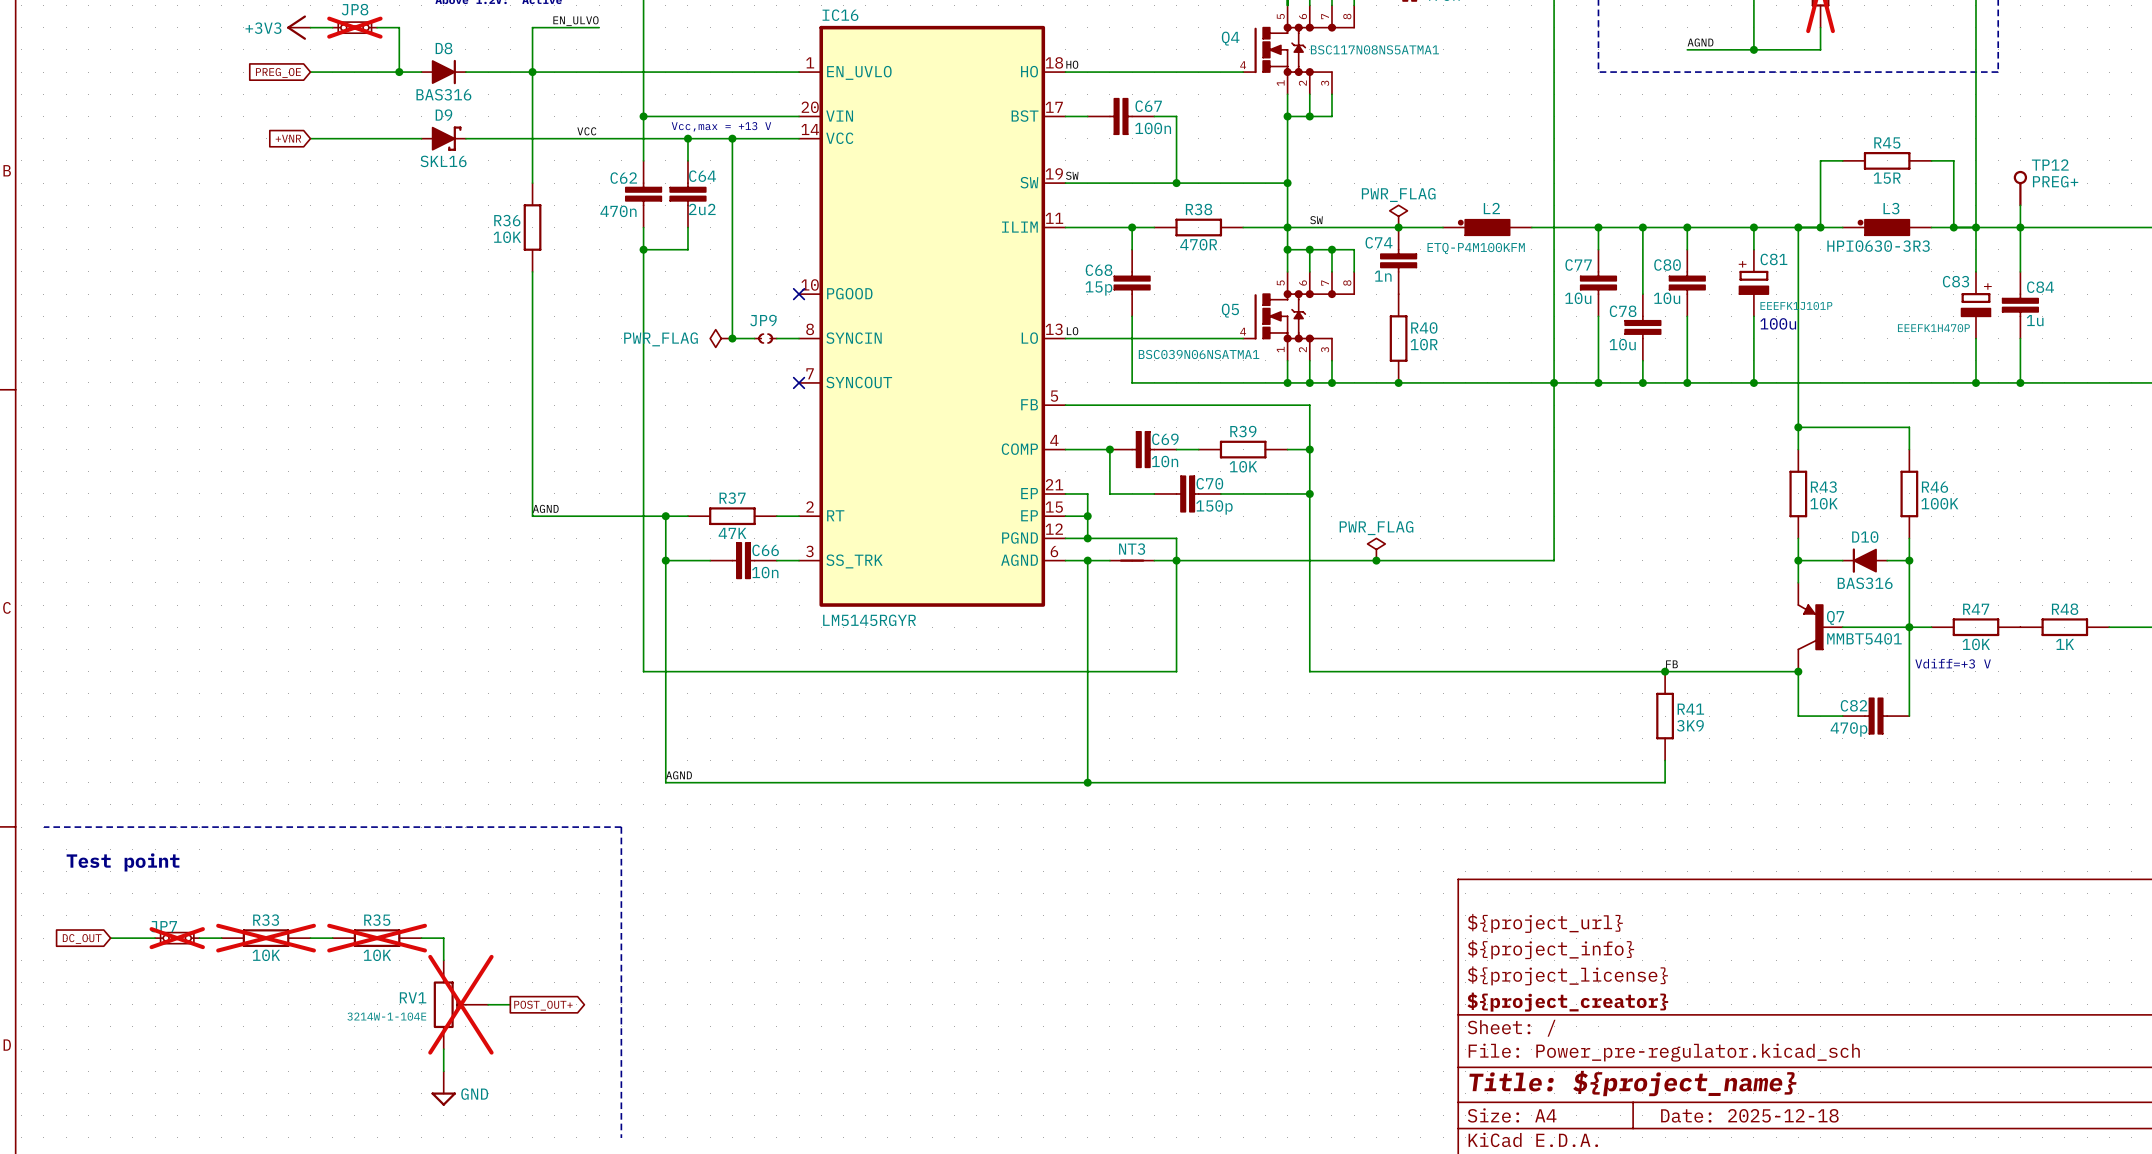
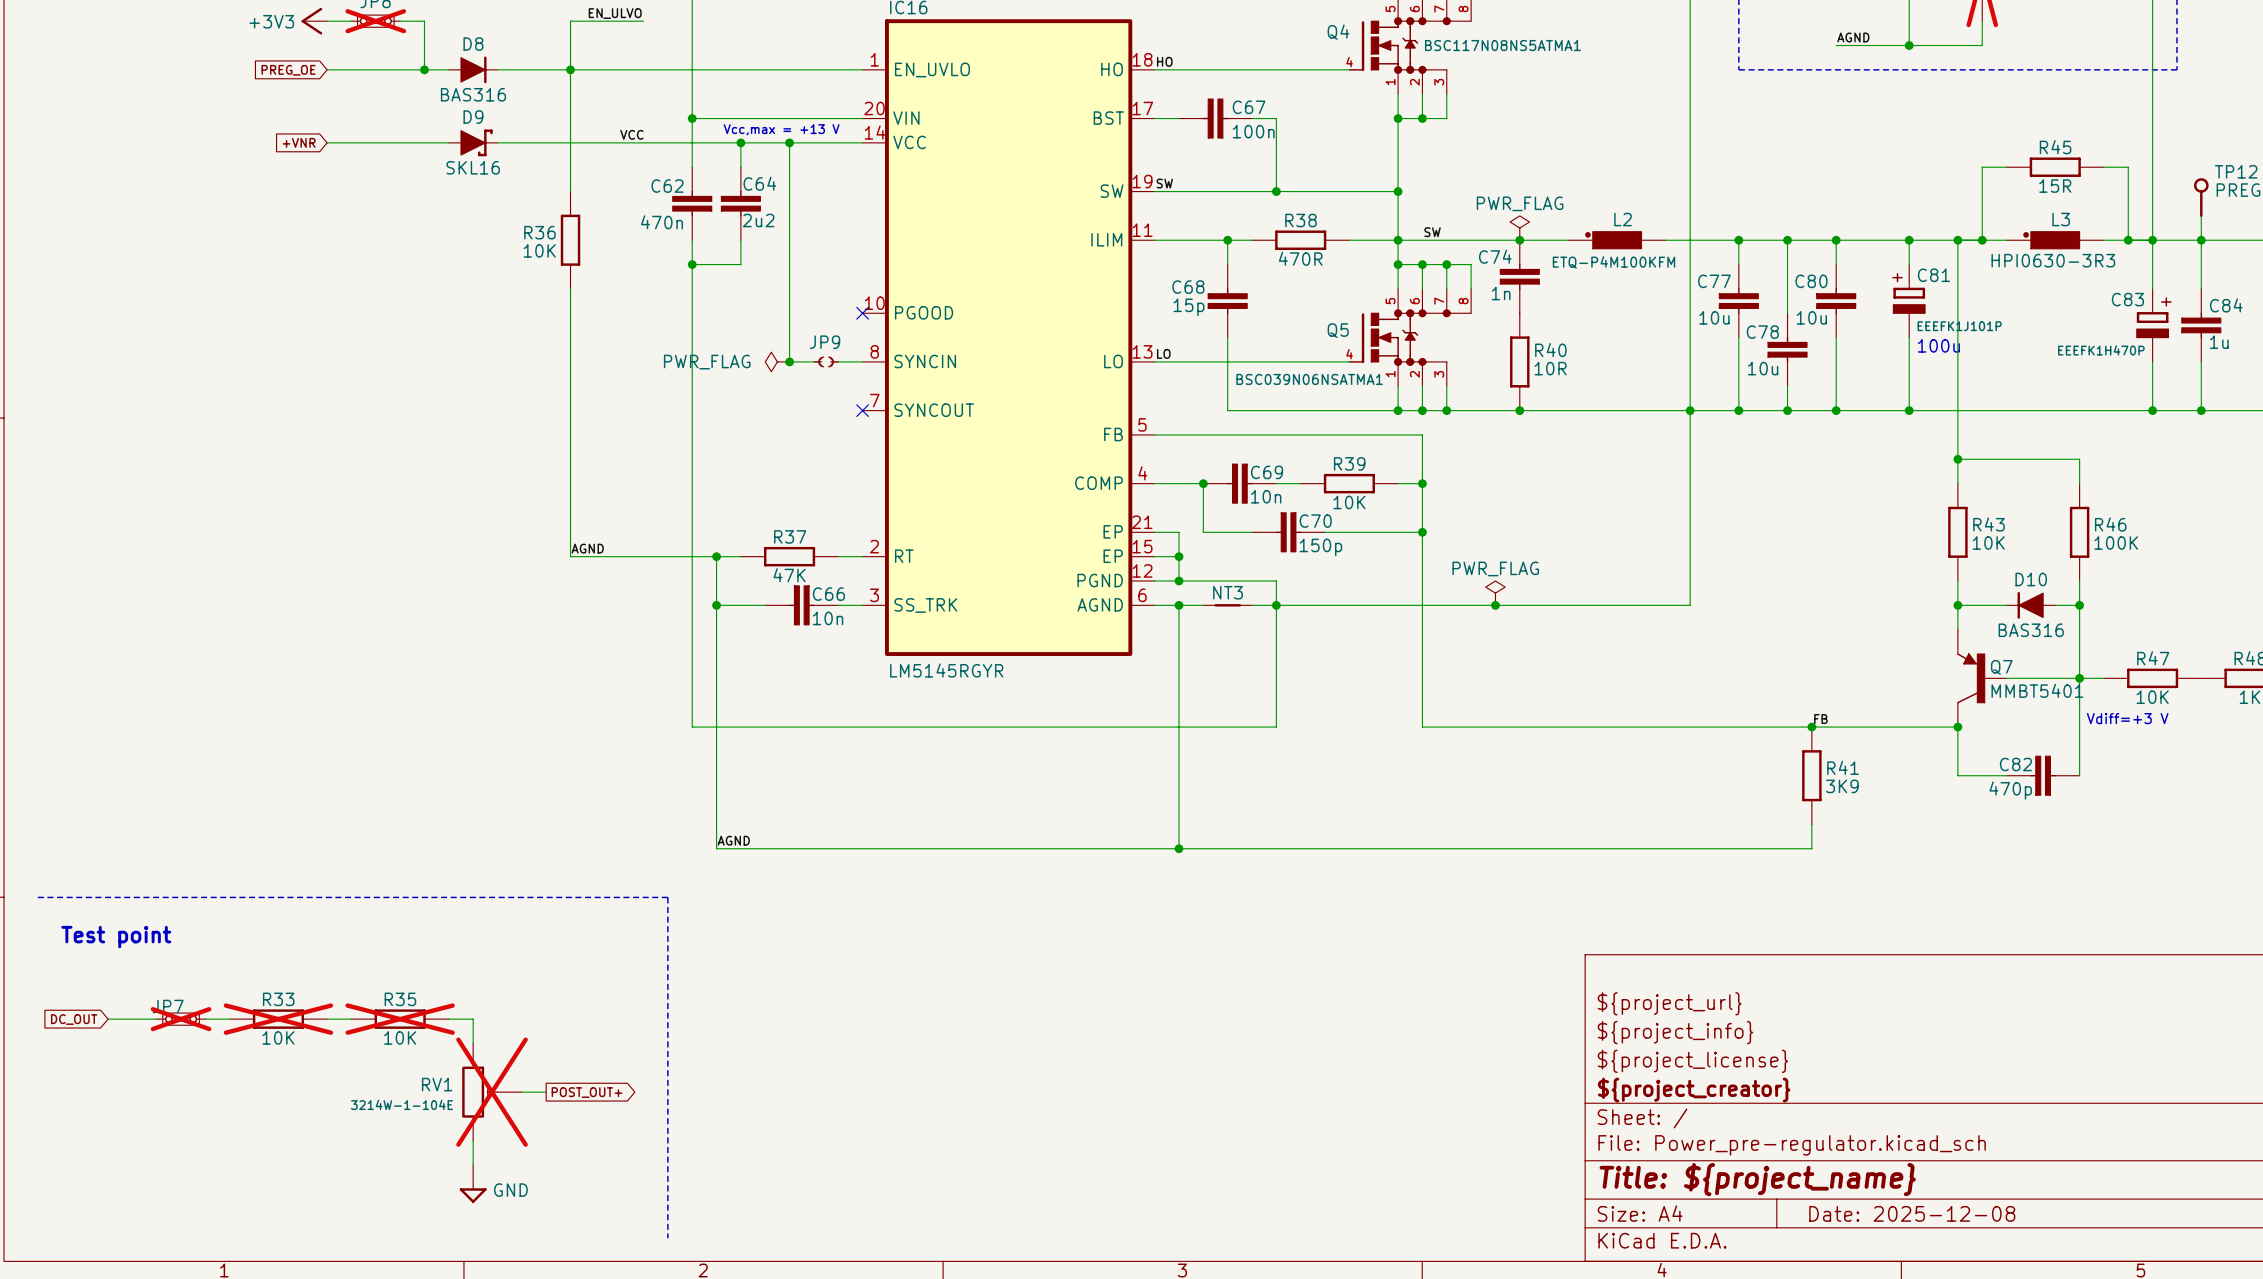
title block: Date: 2025-12-18 (1749, 1115) -> Date: 2025-12-08 (1912, 1213)

